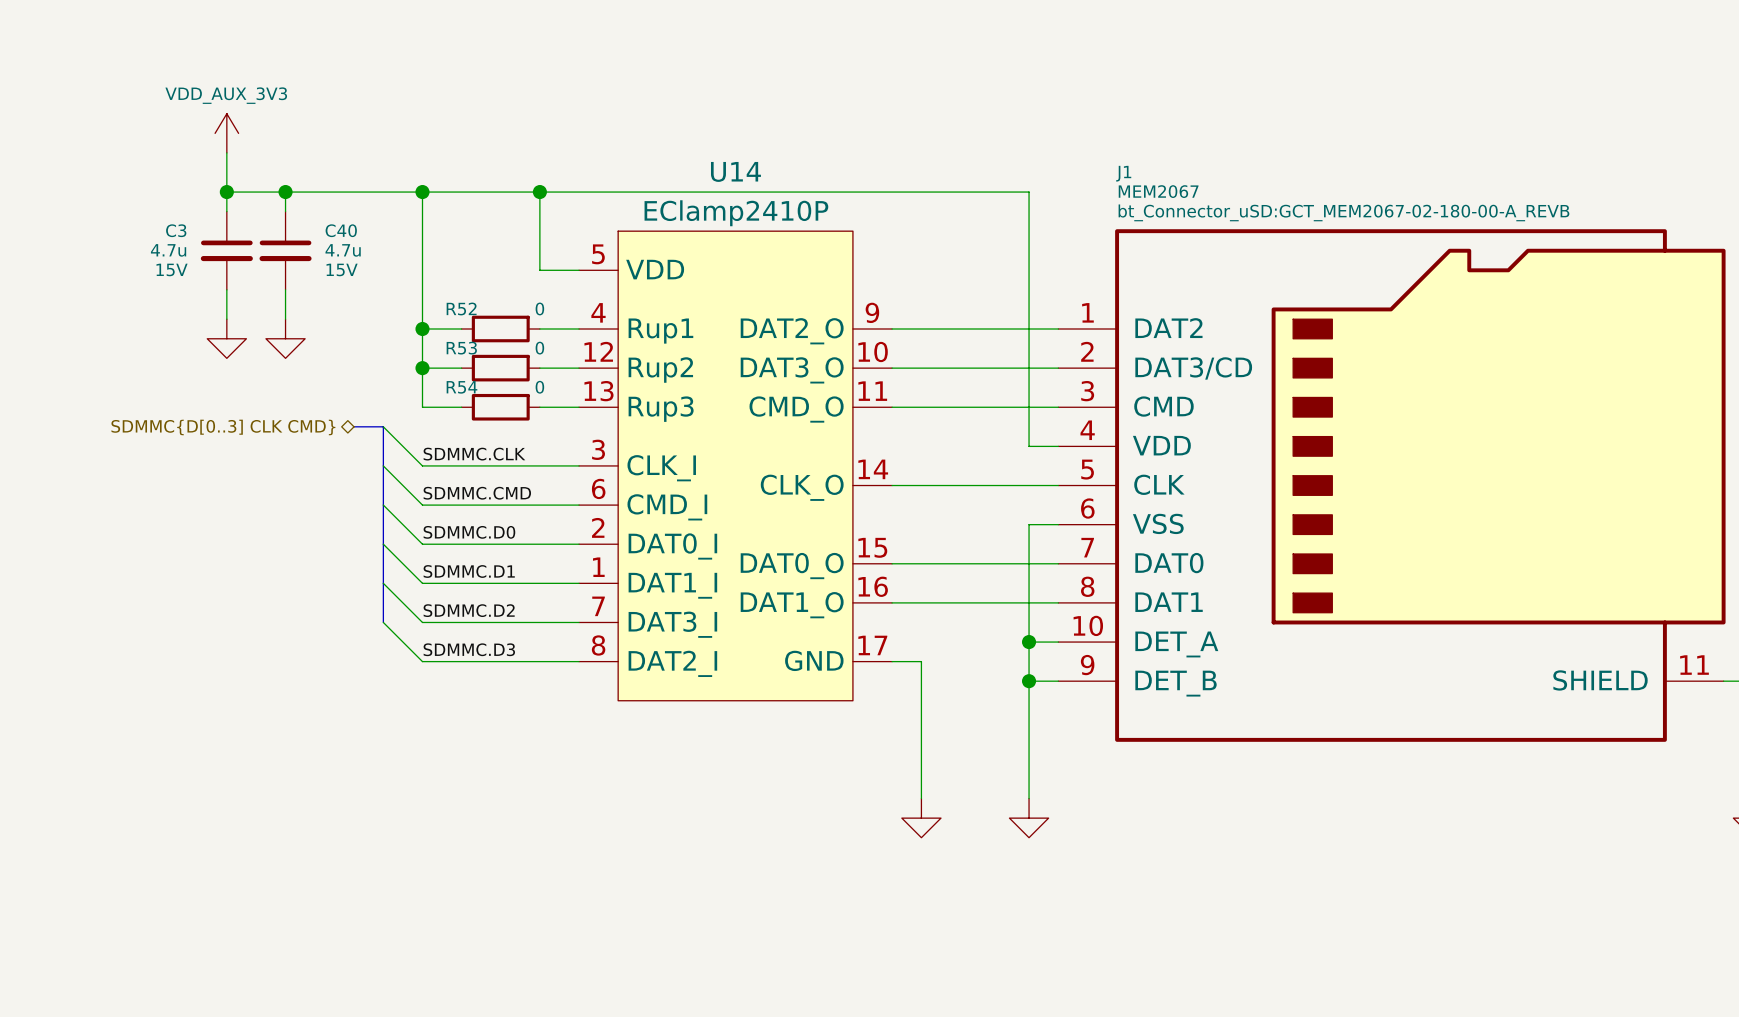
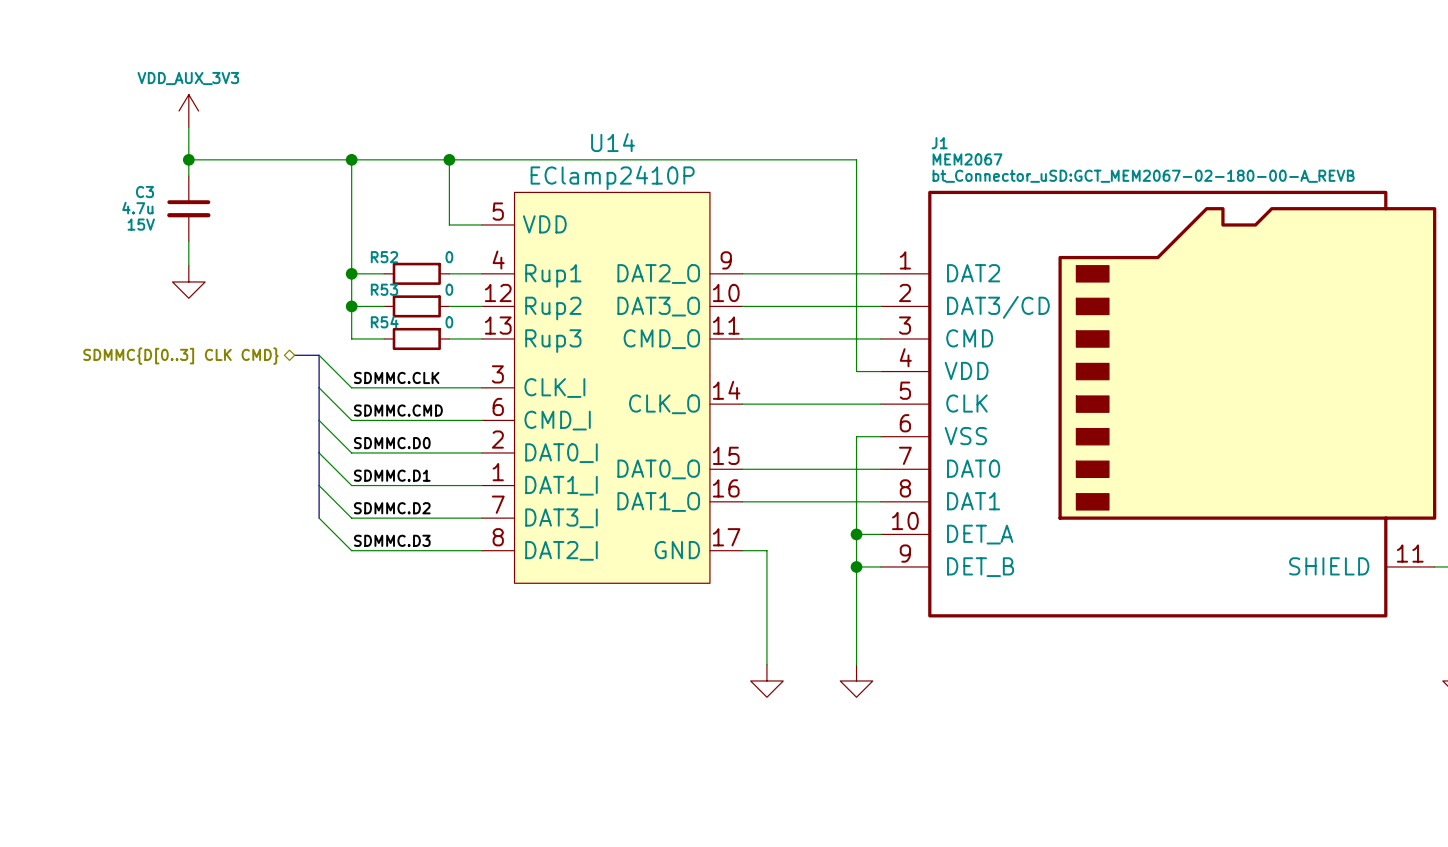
wire: (285, 192) (285, 211) -> none
junction: (285, 192) -> none
C40: 4.7u (285, 250) -> none
wire: (285, 289) (285, 319) -> none
power symbol: (285, 338) -> none

